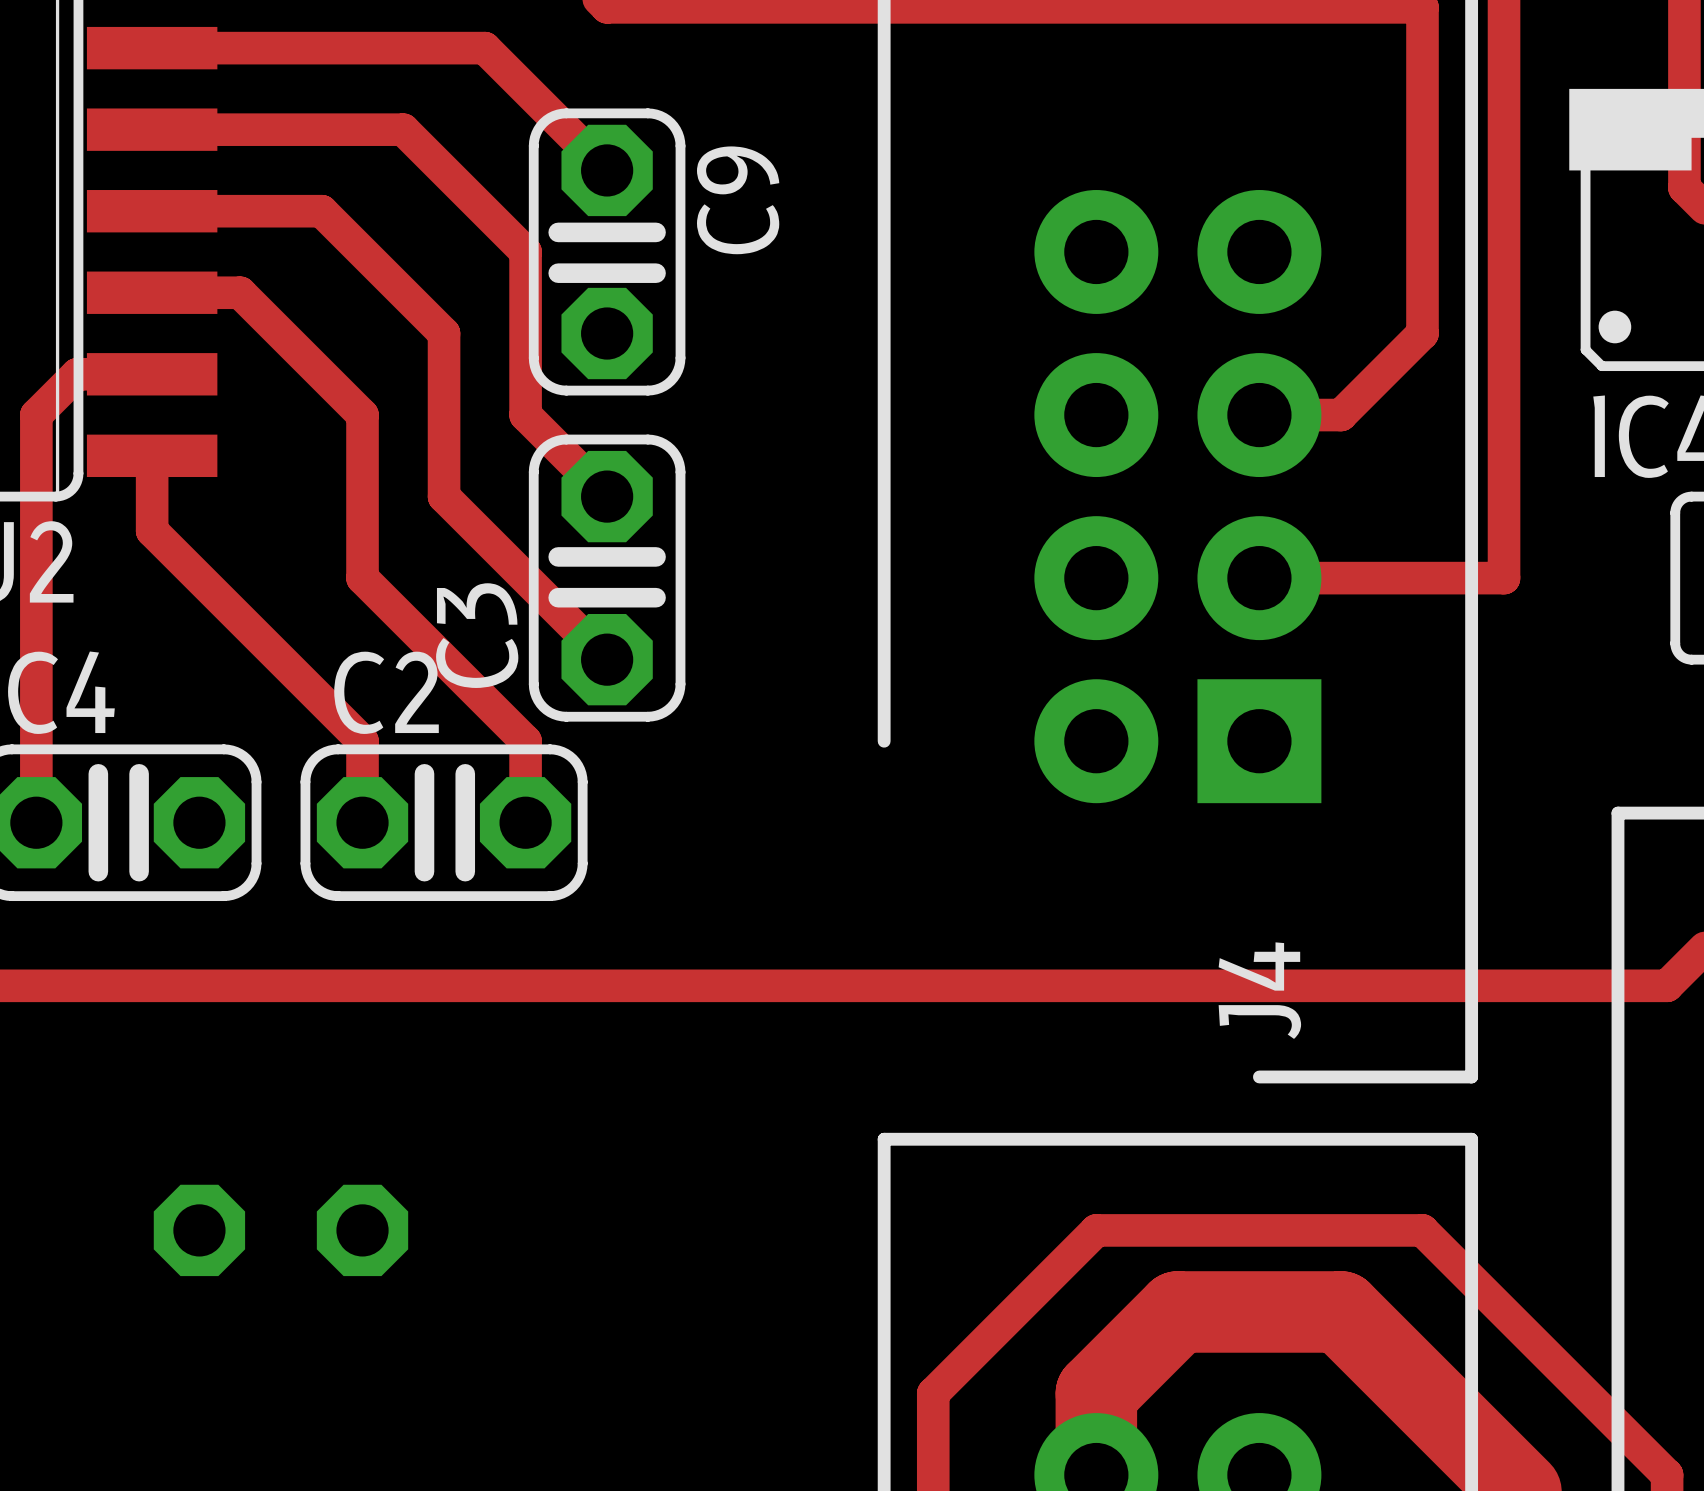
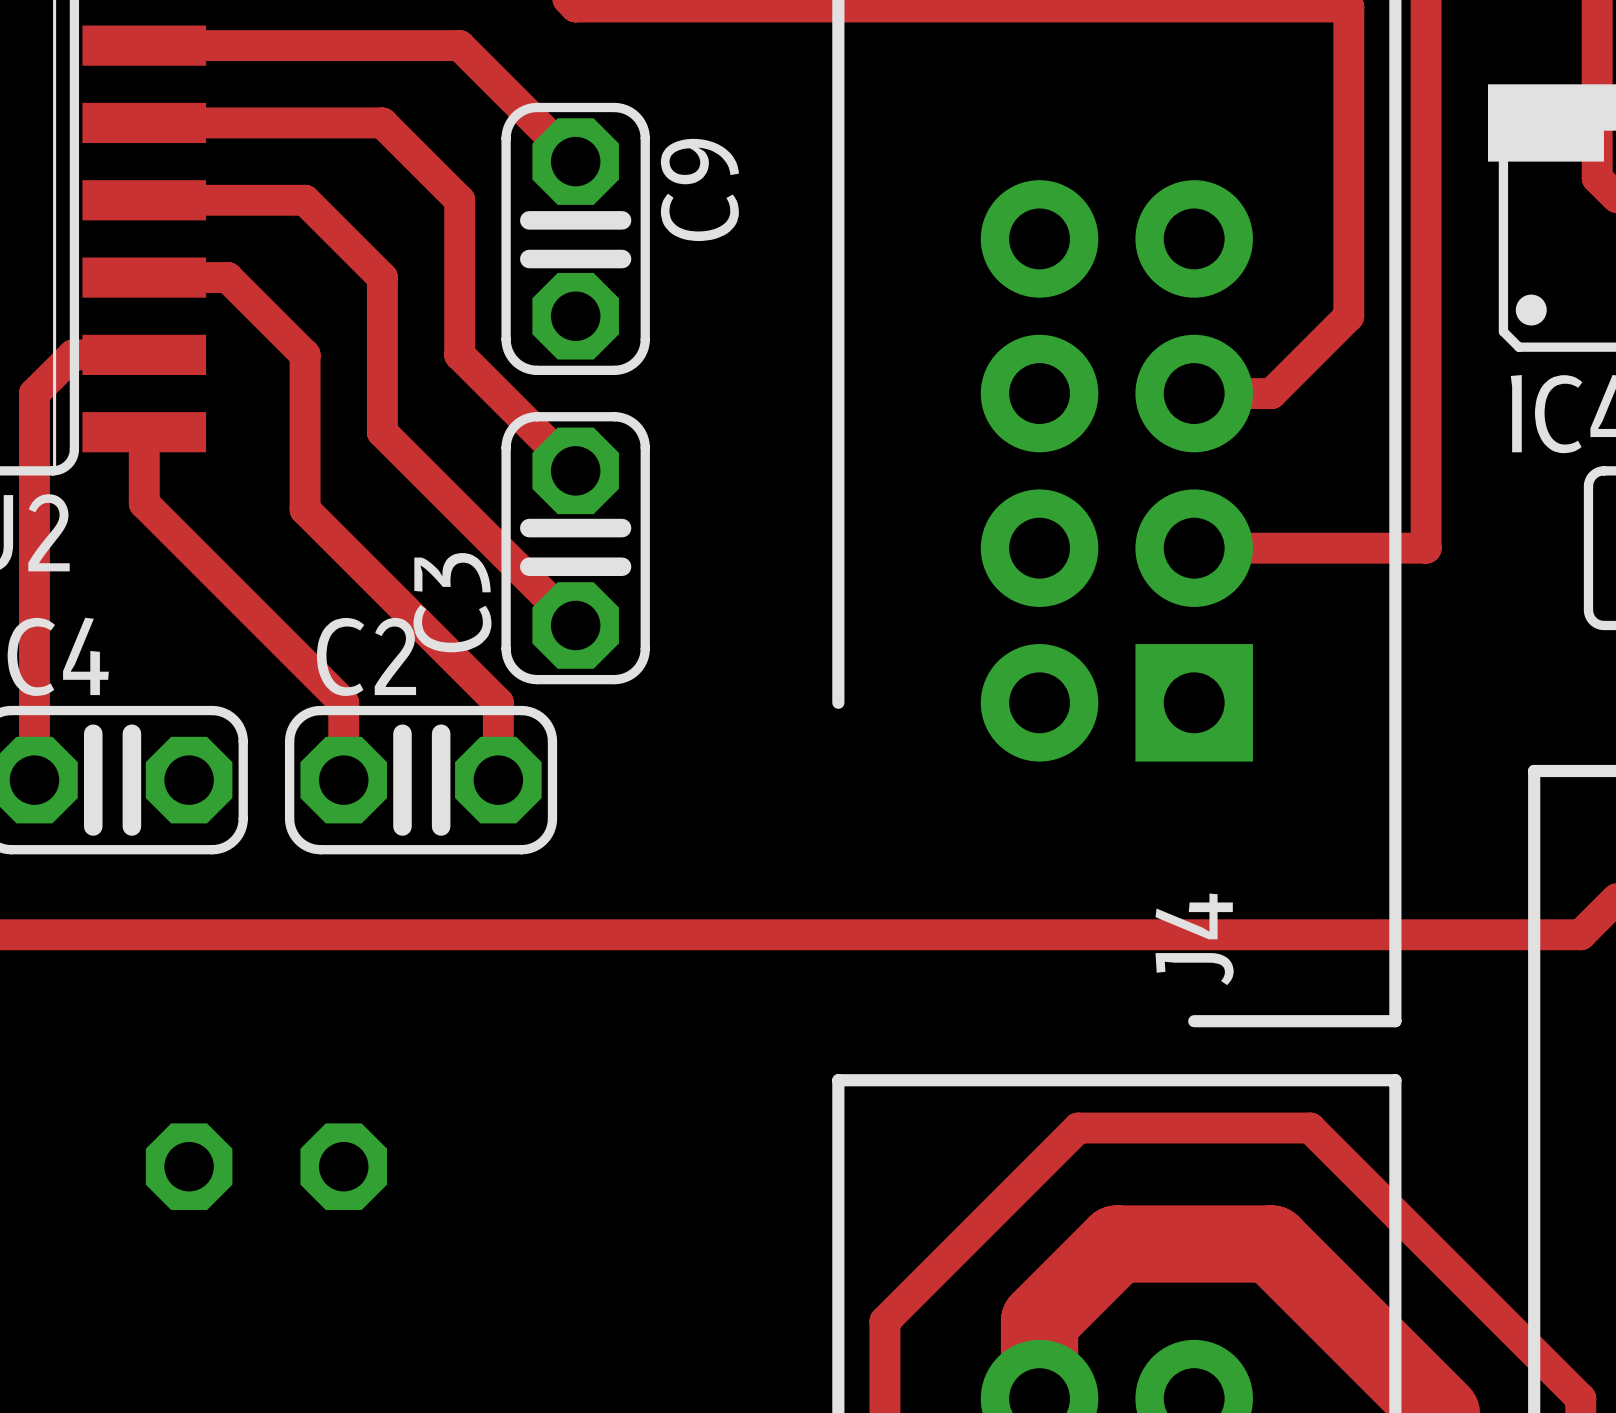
track: (484, 211) (525, 251) (525, 415) -> (459, 200) (459, 354) (498, 393)
track: (403, 292) (444, 333) (444, 496) -> (382, 277) (382, 432) (421, 470)
track: (321, 374) (362, 415) (362, 578) -> (305, 354) (305, 509) (343, 548)
track: (1096, 1230) (1422, 1230) -> (1039, 1166) (1078, 1128) (1310, 1128) (1348, 1166)

